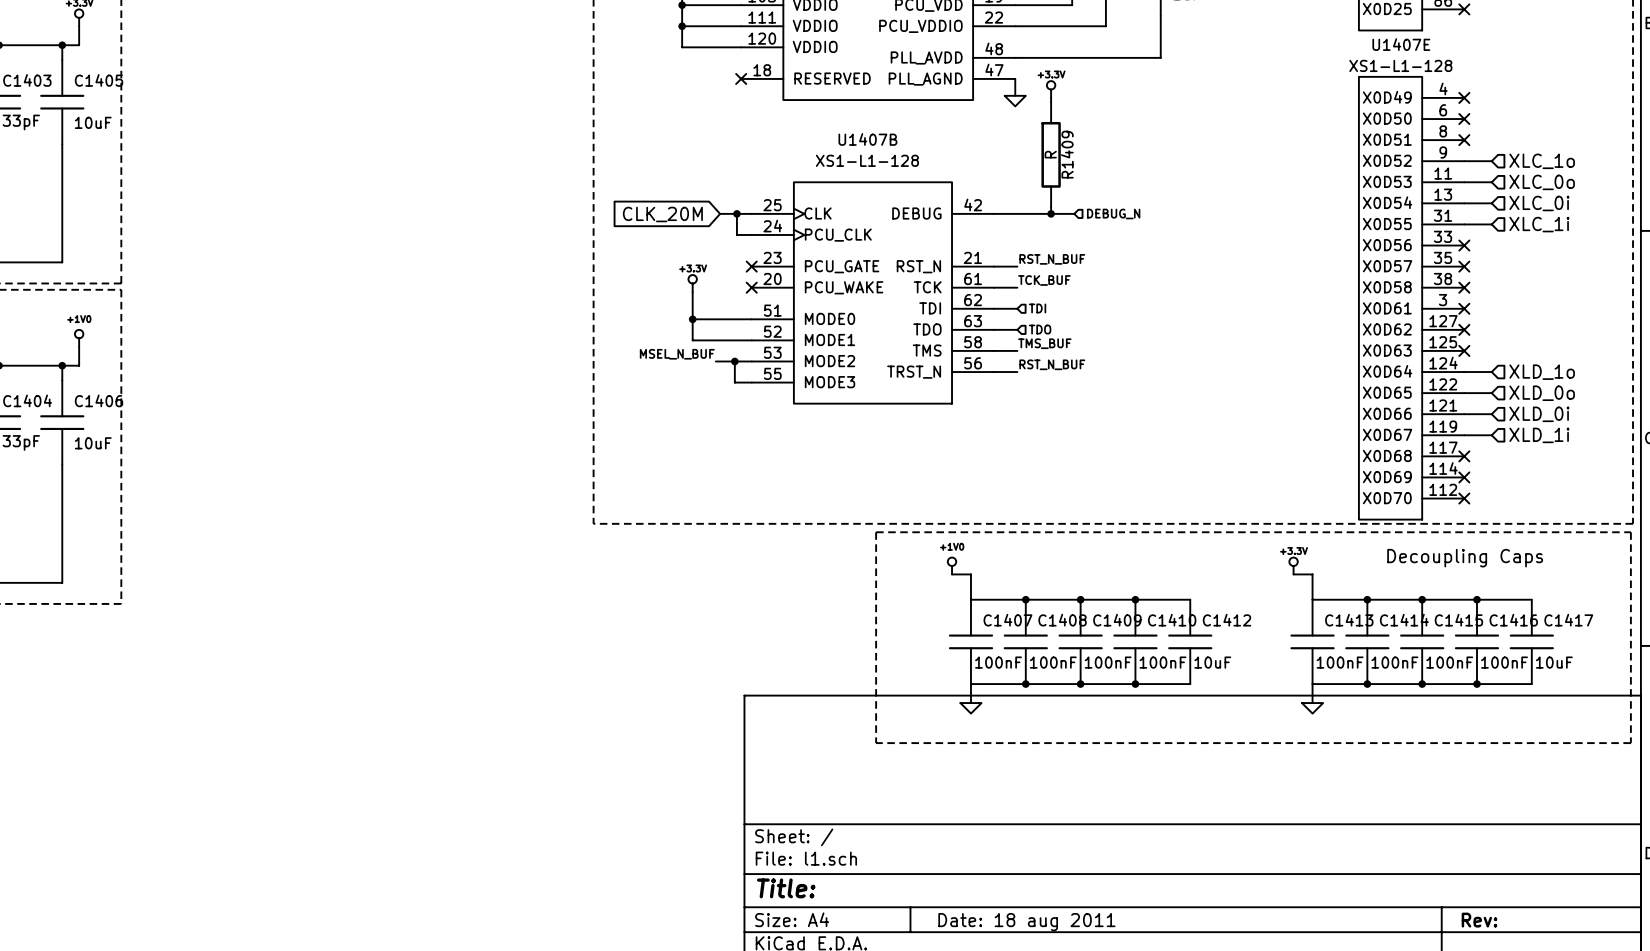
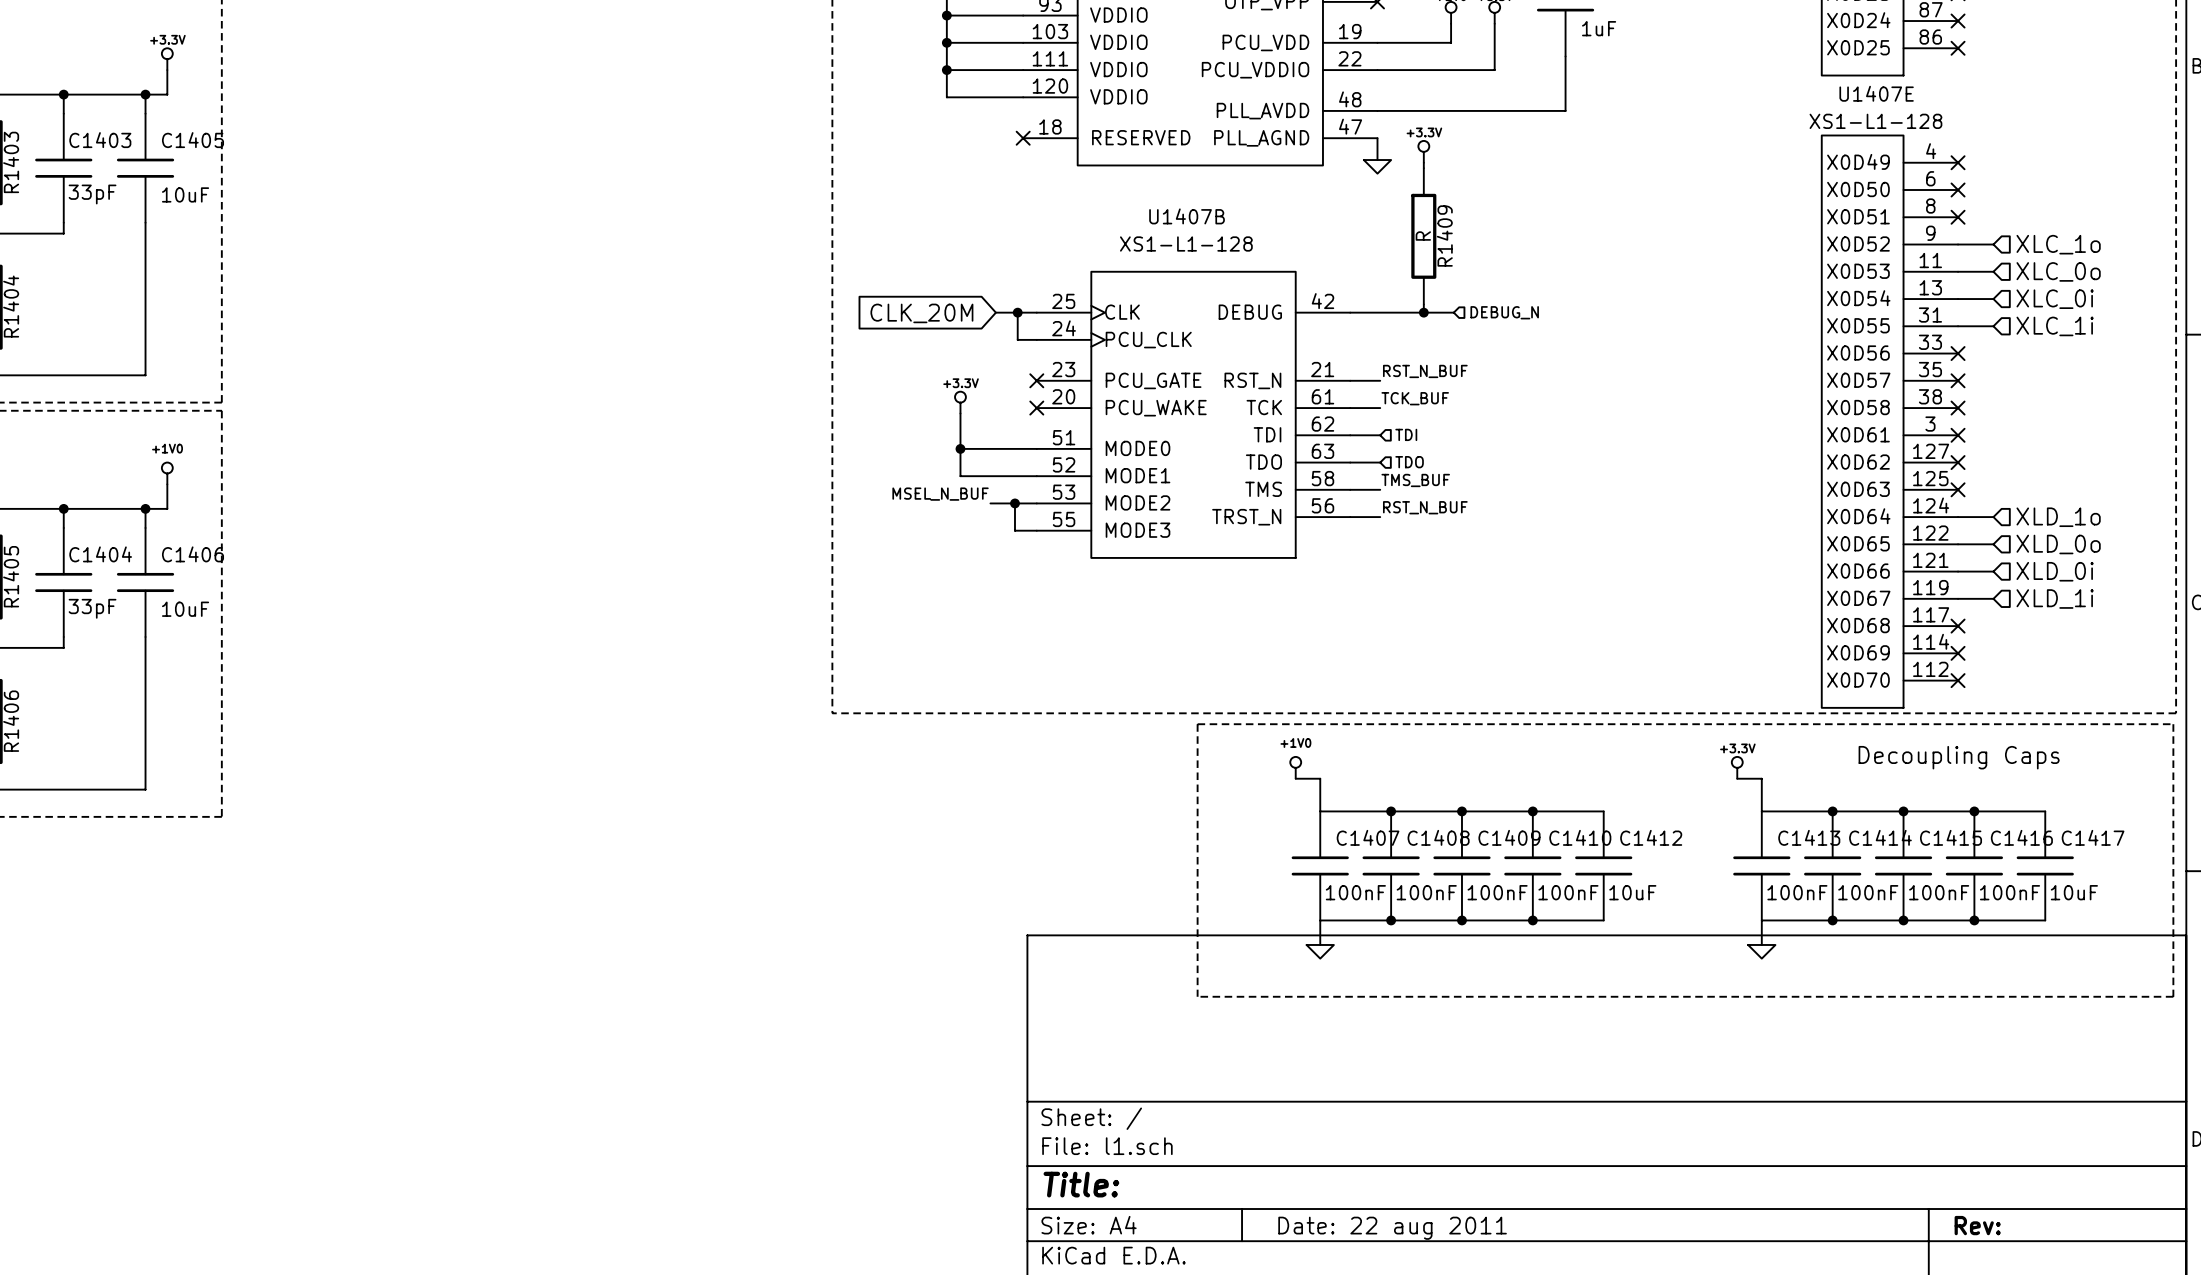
title block: Date: 18 aug 2011 (1026, 922) -> Date: 22 aug 2011 (1392, 1228)

